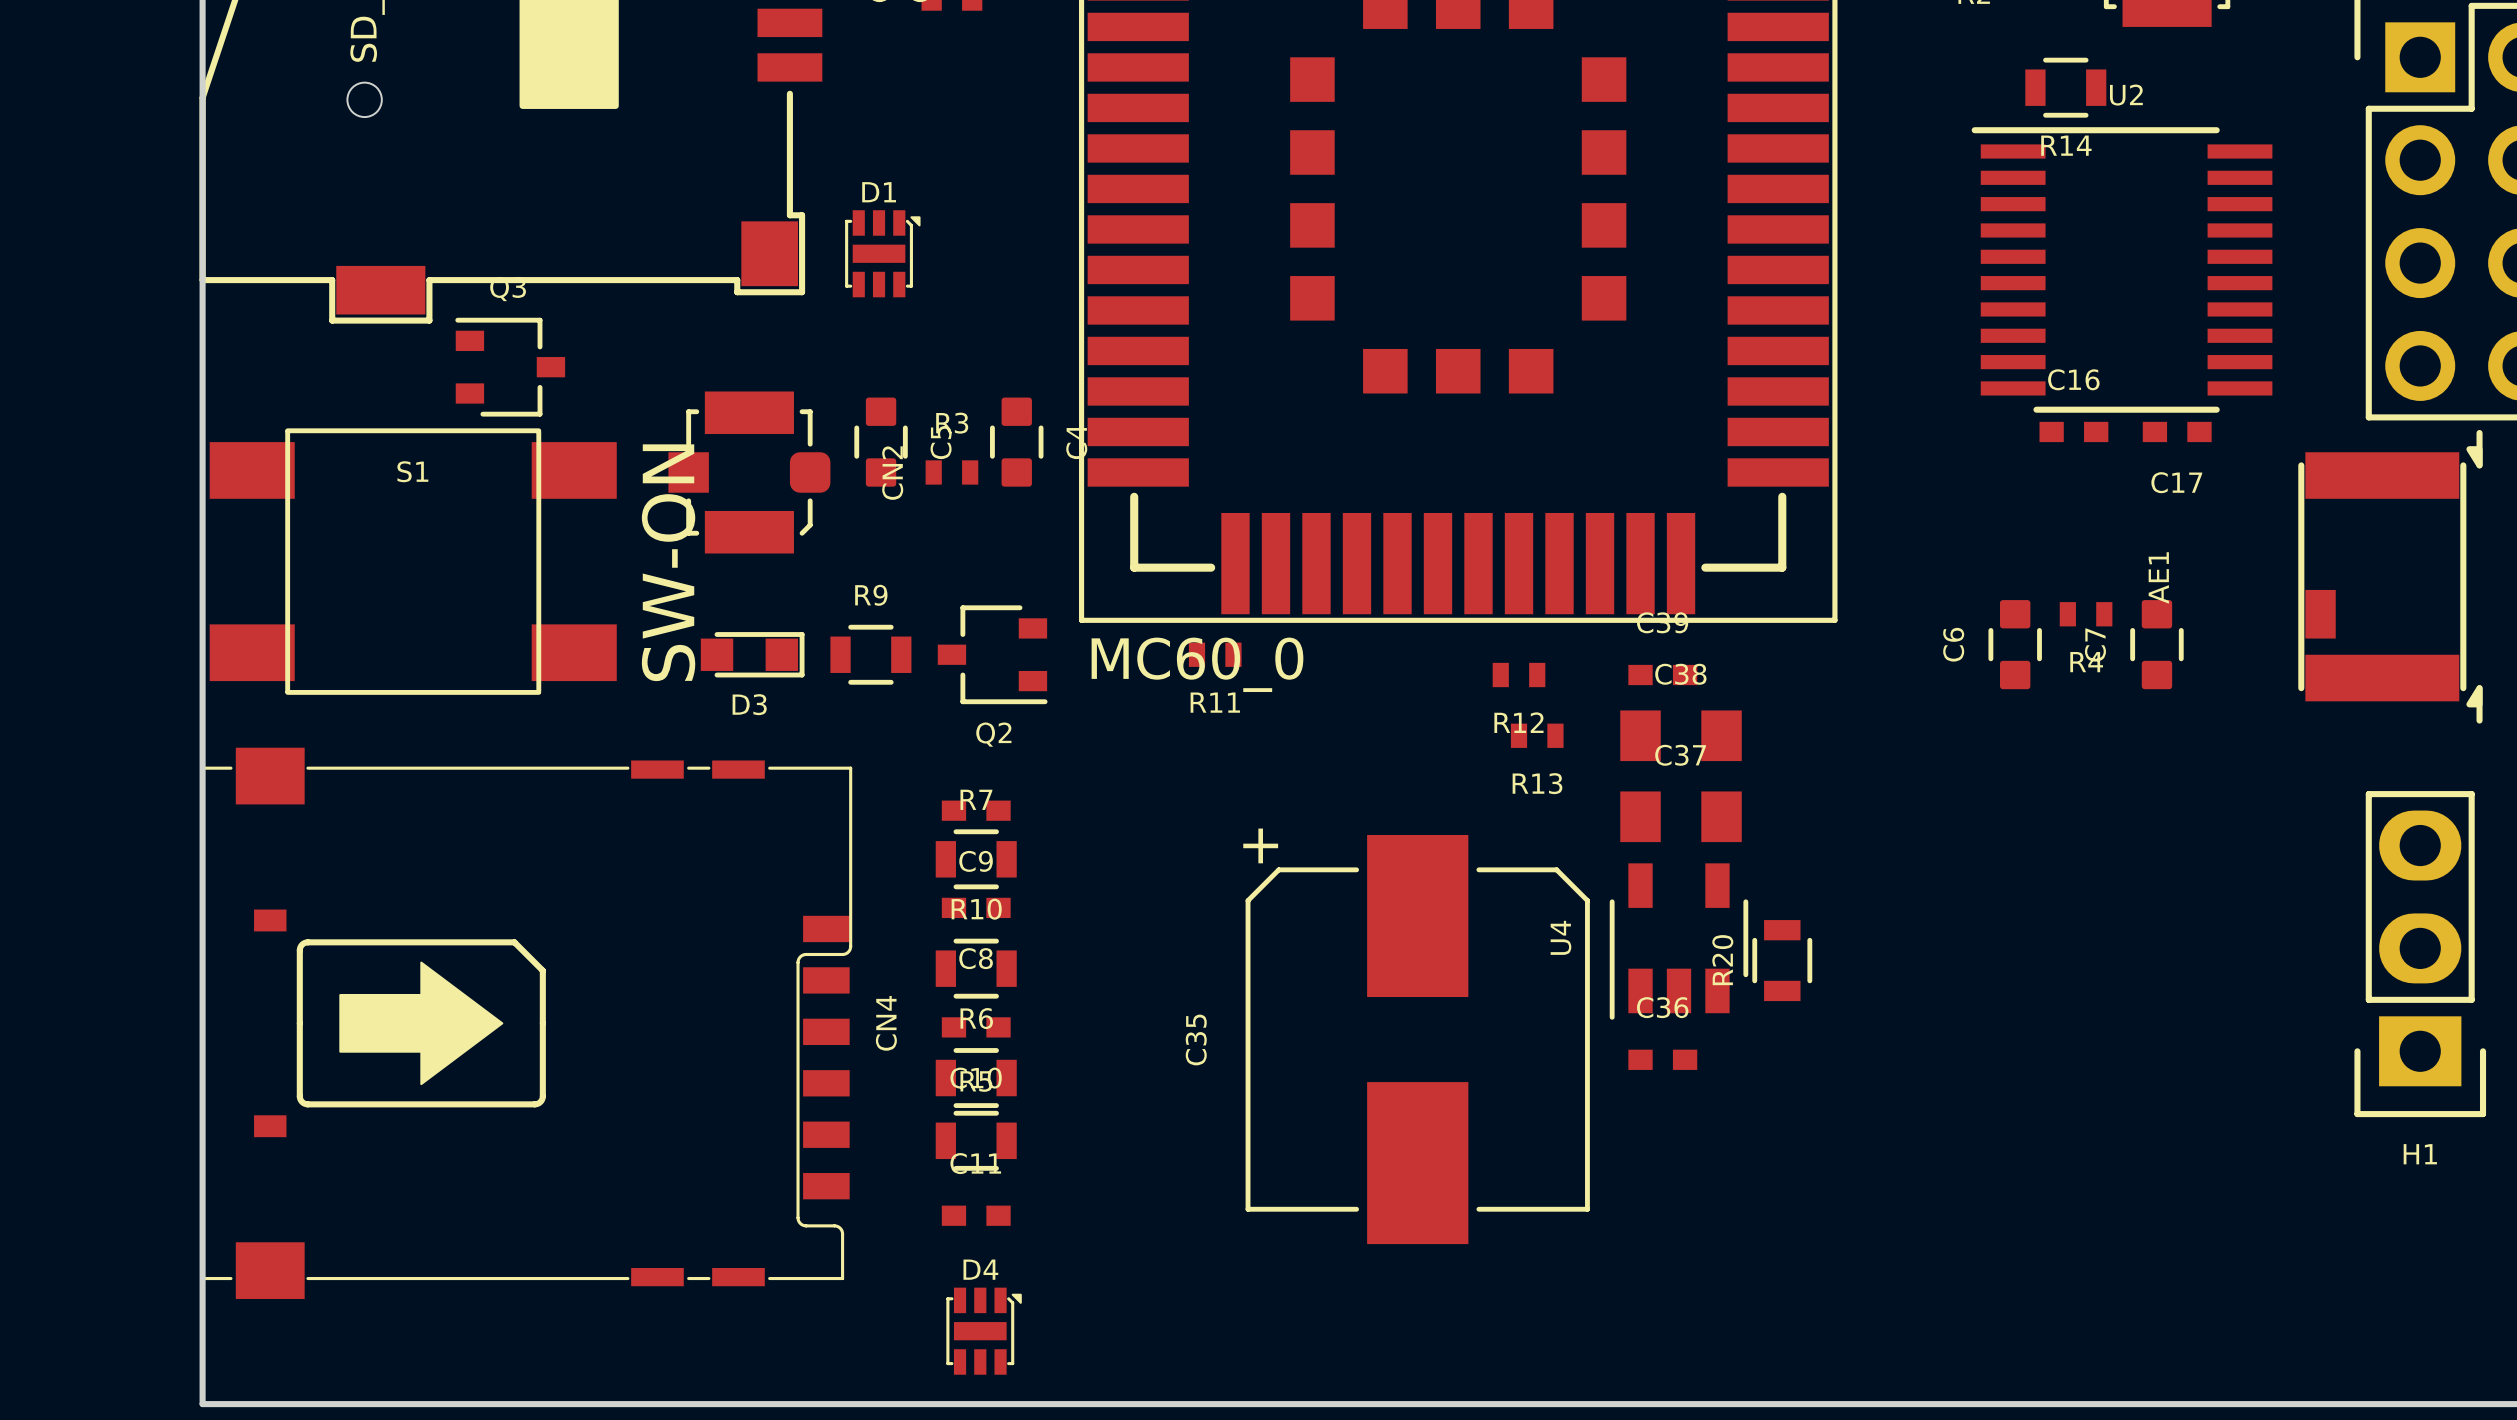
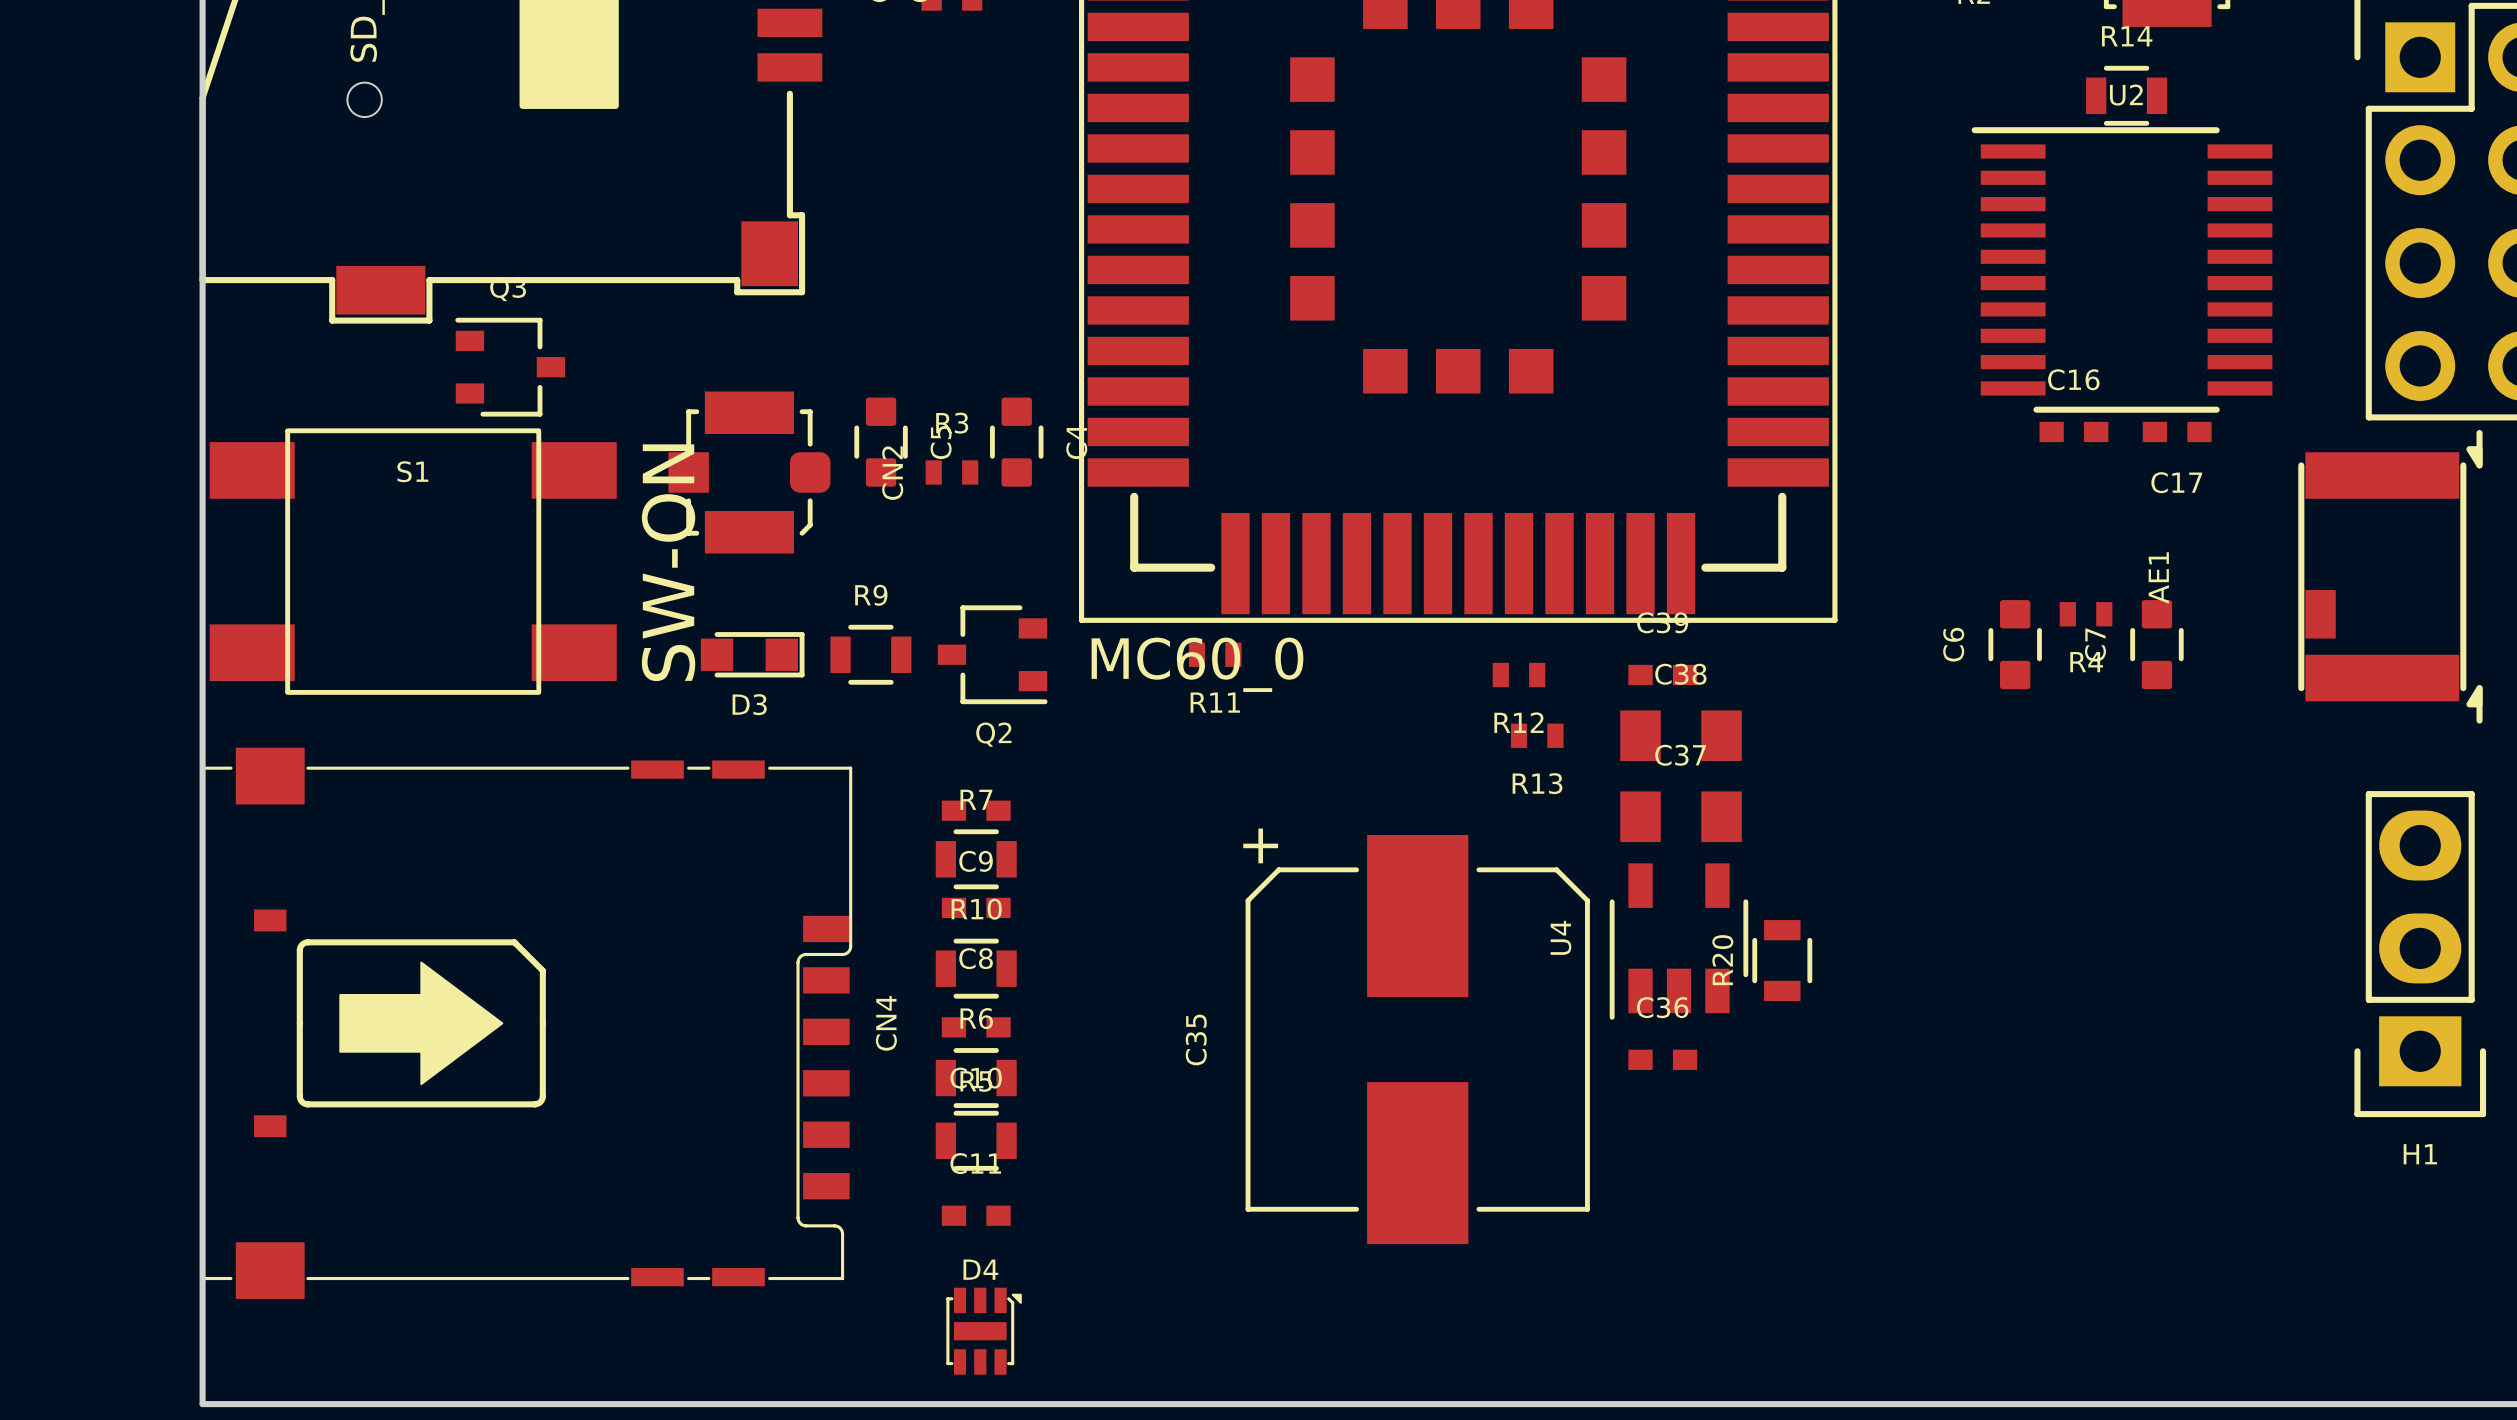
R14 position: (2065, 87) -> (2126, 95)
R14 name position: R14 (2066, 145) -> R14 (2127, 36)
D1: (882, 253) -> none

